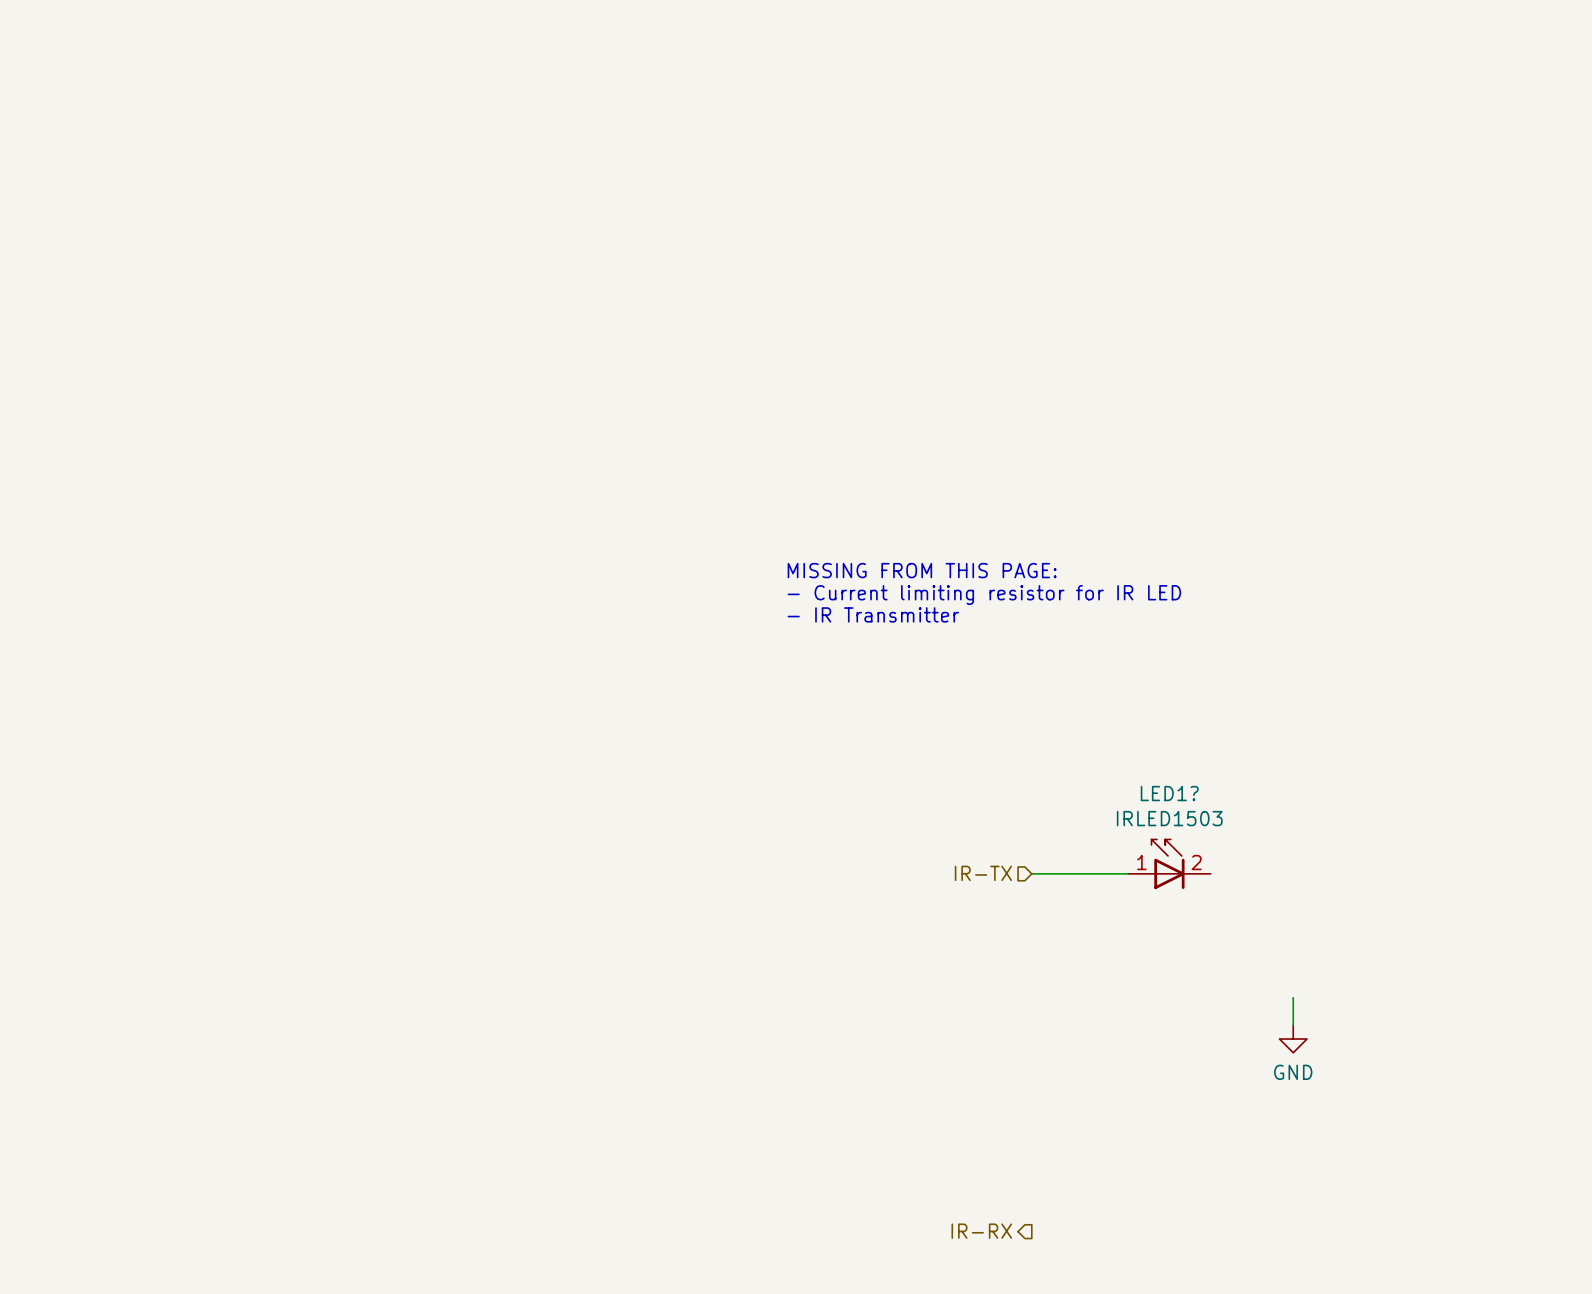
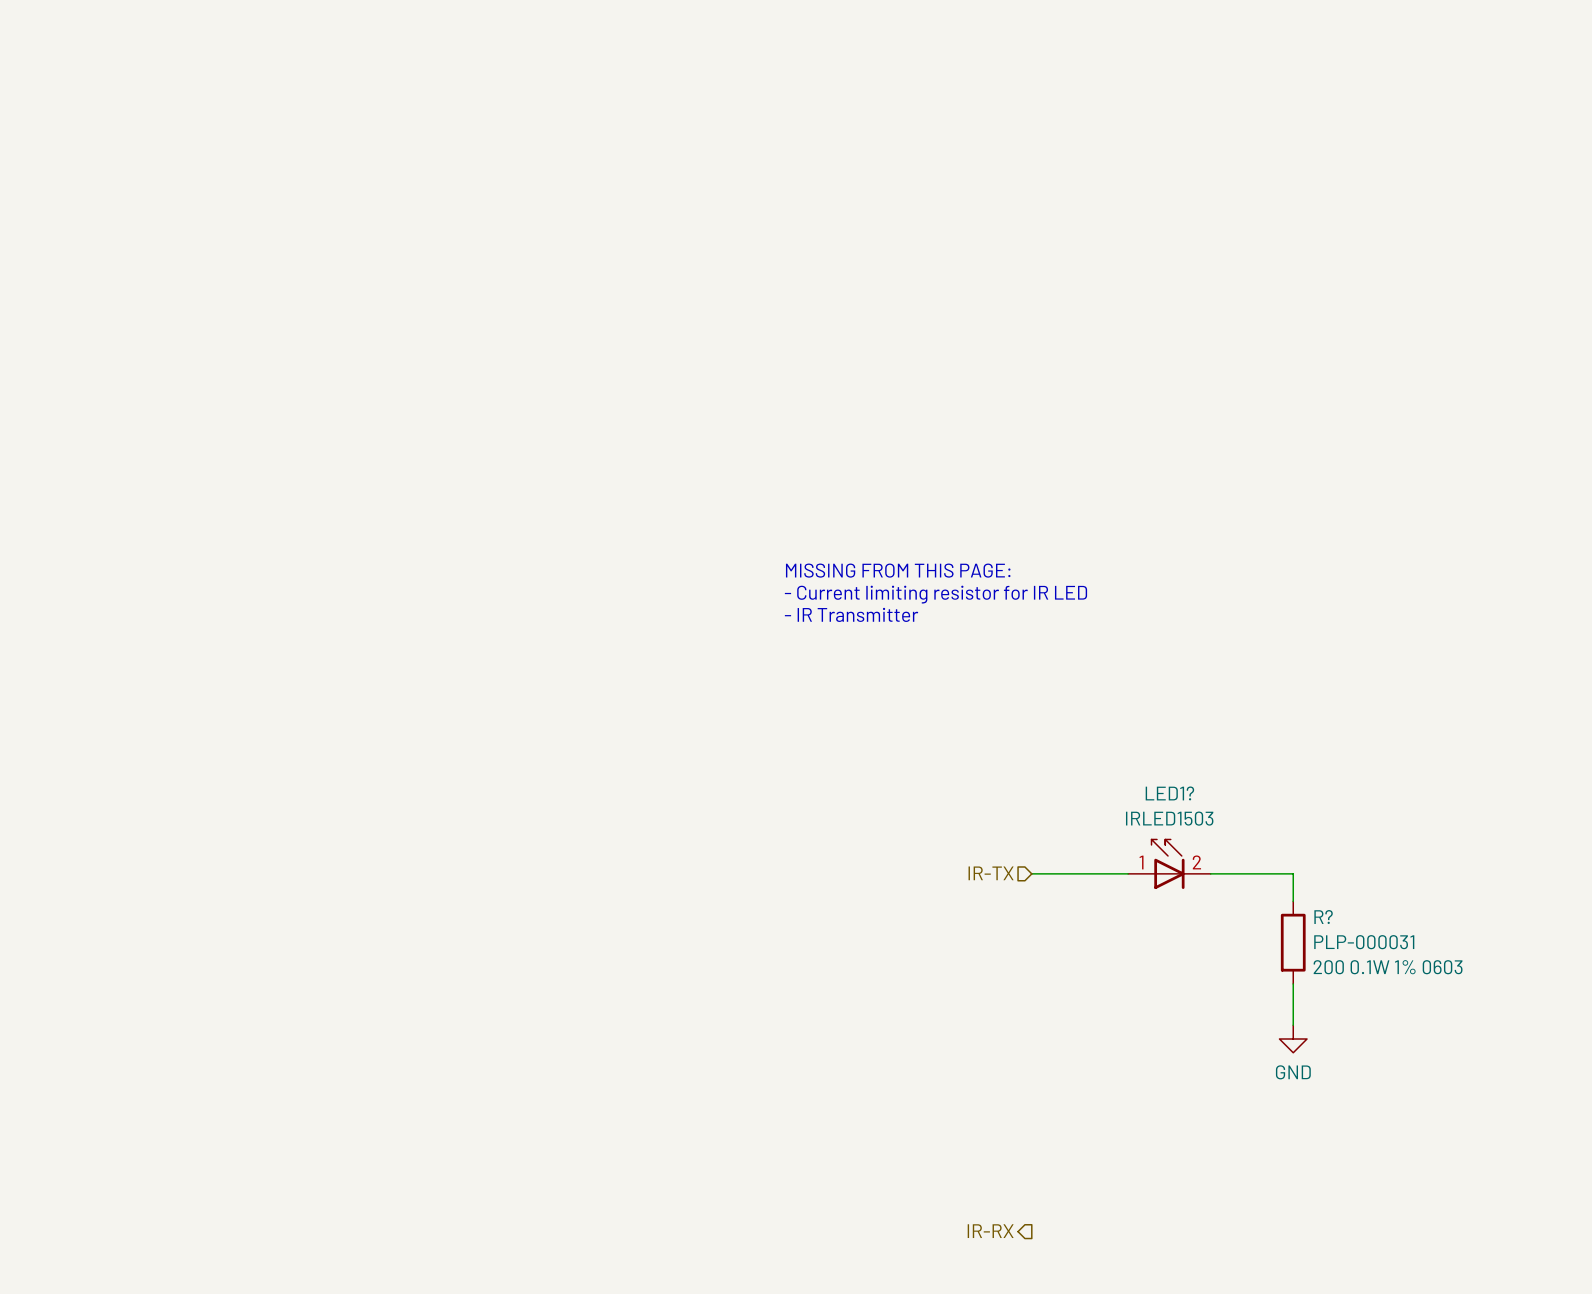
wire: none -> (1210, 873) (1293, 873) (1293, 901)
R?: none -> PLP-000031 (1293, 942)
wire: none -> (1293, 983) (1293, 997)

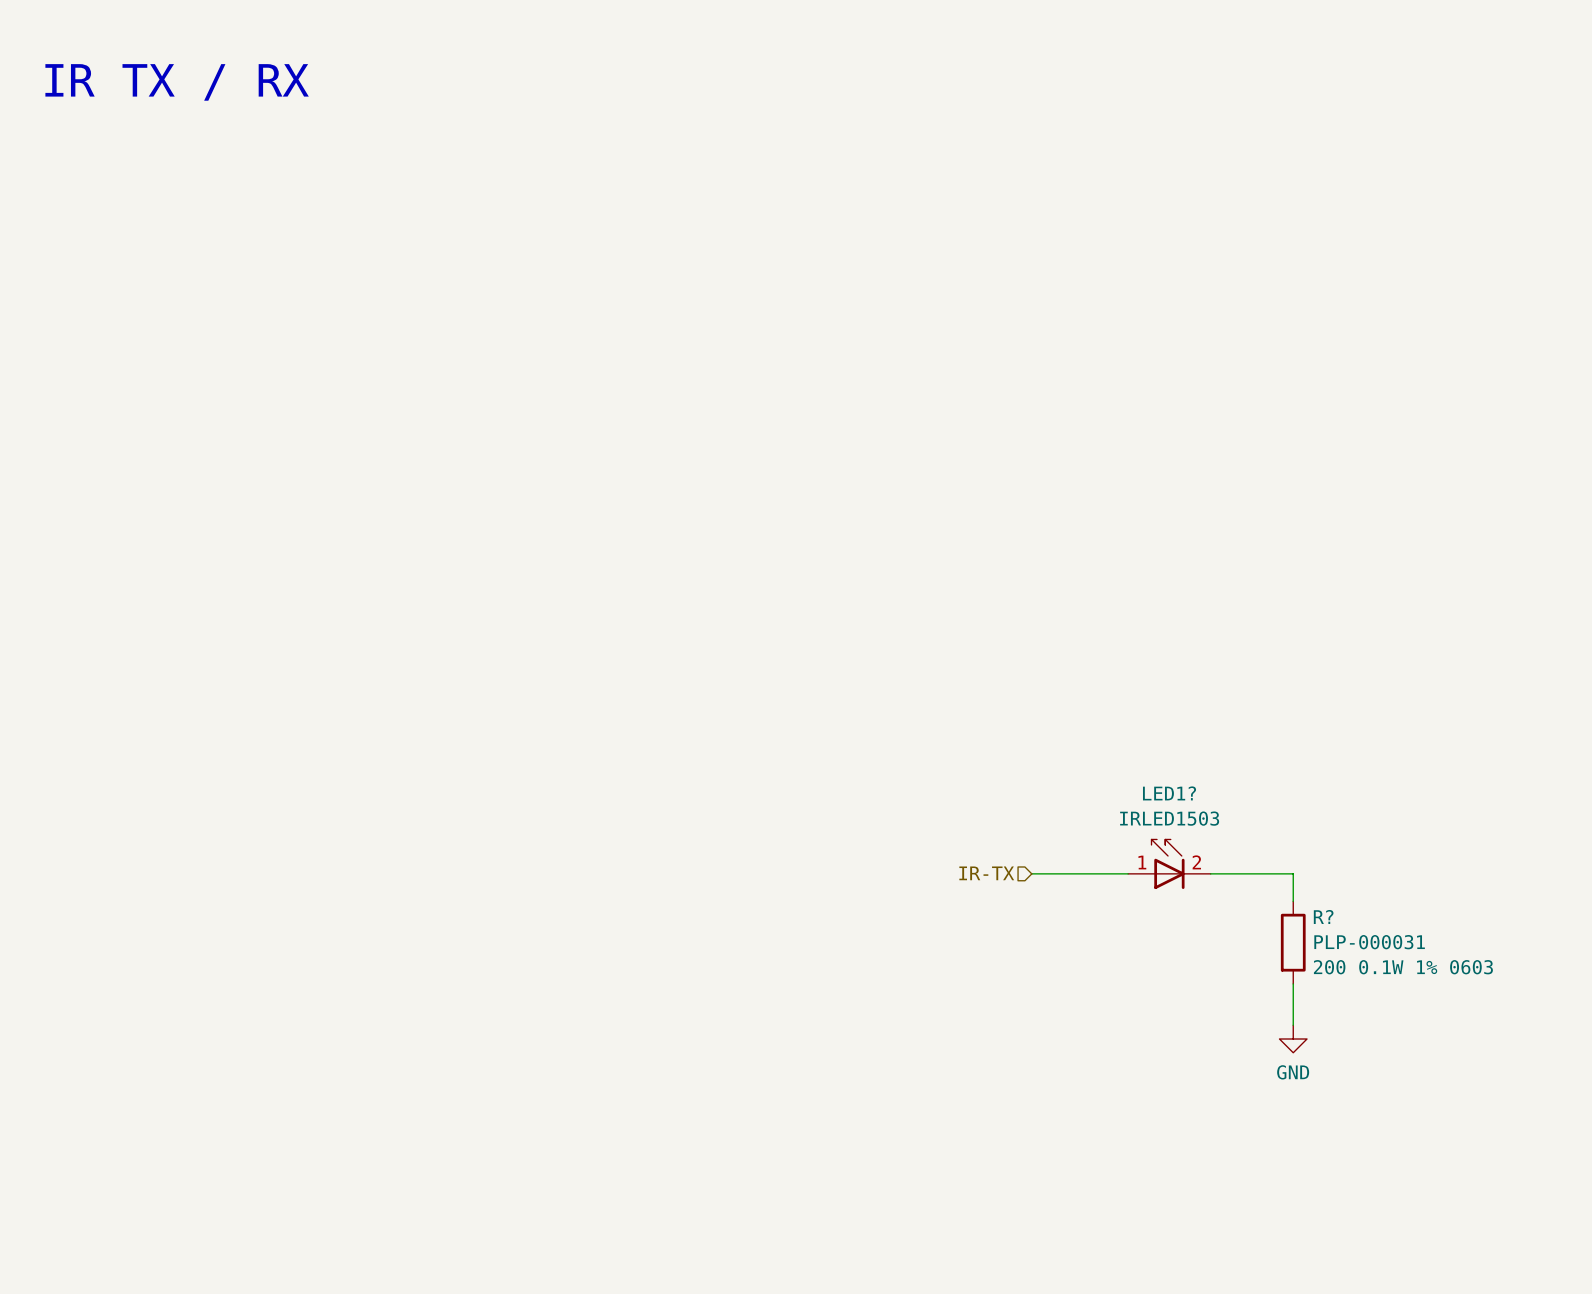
text: none -> IR TX / RX (177, 82)
text: MISSING FROM THIS PAGE: (898, 570) -> none
text: - Current limiting resistor for IR LED (935, 594) -> none
text: - IR Transmitter (851, 614) -> none
hierarchical label: IR-RX (990, 1231) -> none

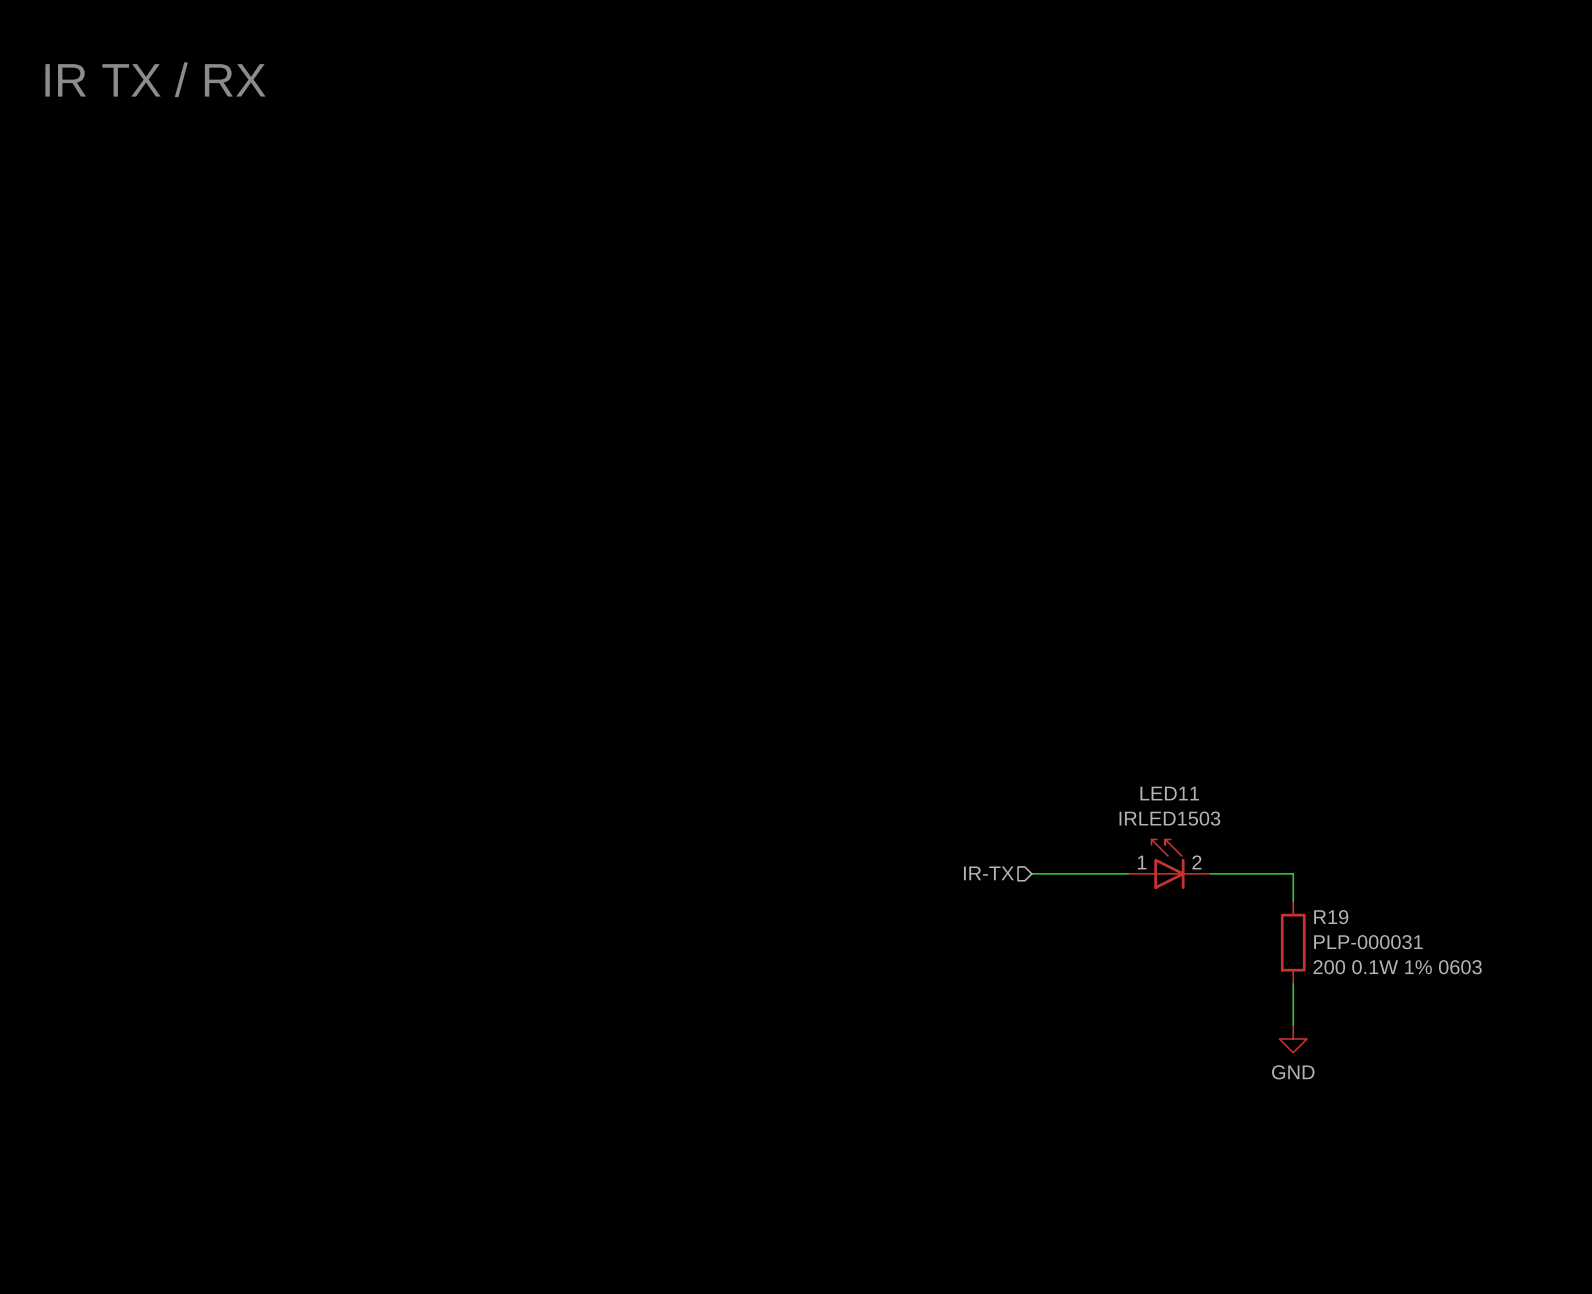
LED1? name: LED1? (1169, 793) -> LED11 (1169, 793)
R? name: R? (1323, 916) -> R19 (1331, 917)

